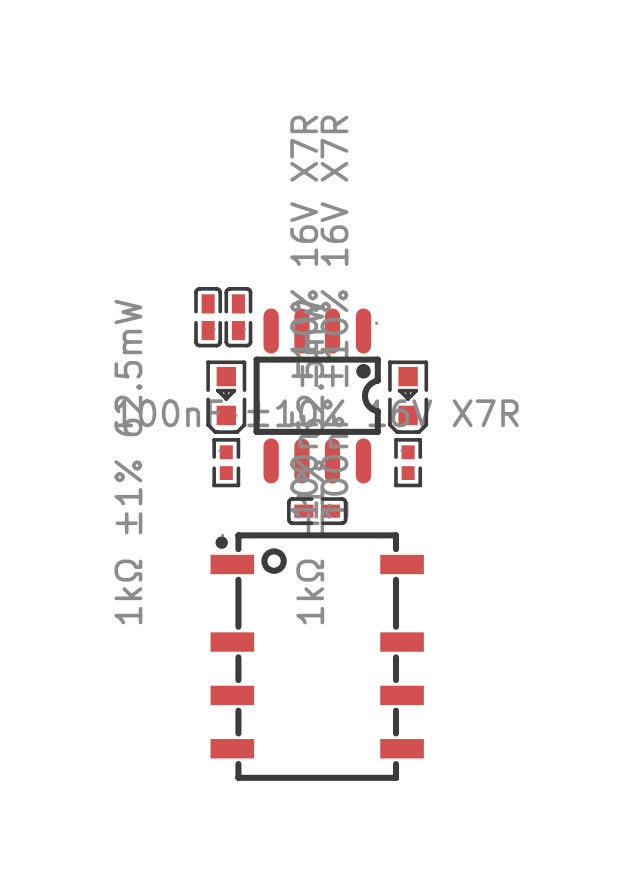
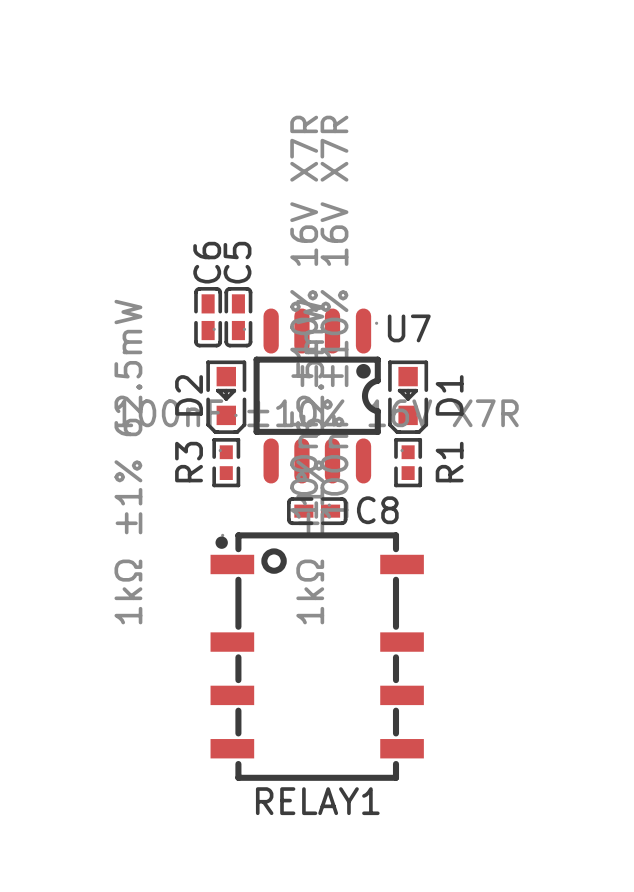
C6 name: none -> C6 (207, 262)
C5 name: none -> C5 (237, 262)
U7 name: none -> U7 (409, 328)
D2 name: none -> D2 (189, 395)
D1 name: none -> D1 (449, 395)
R3 name: none -> R3 (189, 462)
R1 name: none -> R1 (449, 462)
C8 name: none -> C8 (377, 510)
RELAY1 name: none -> RELAY1 (317, 801)

